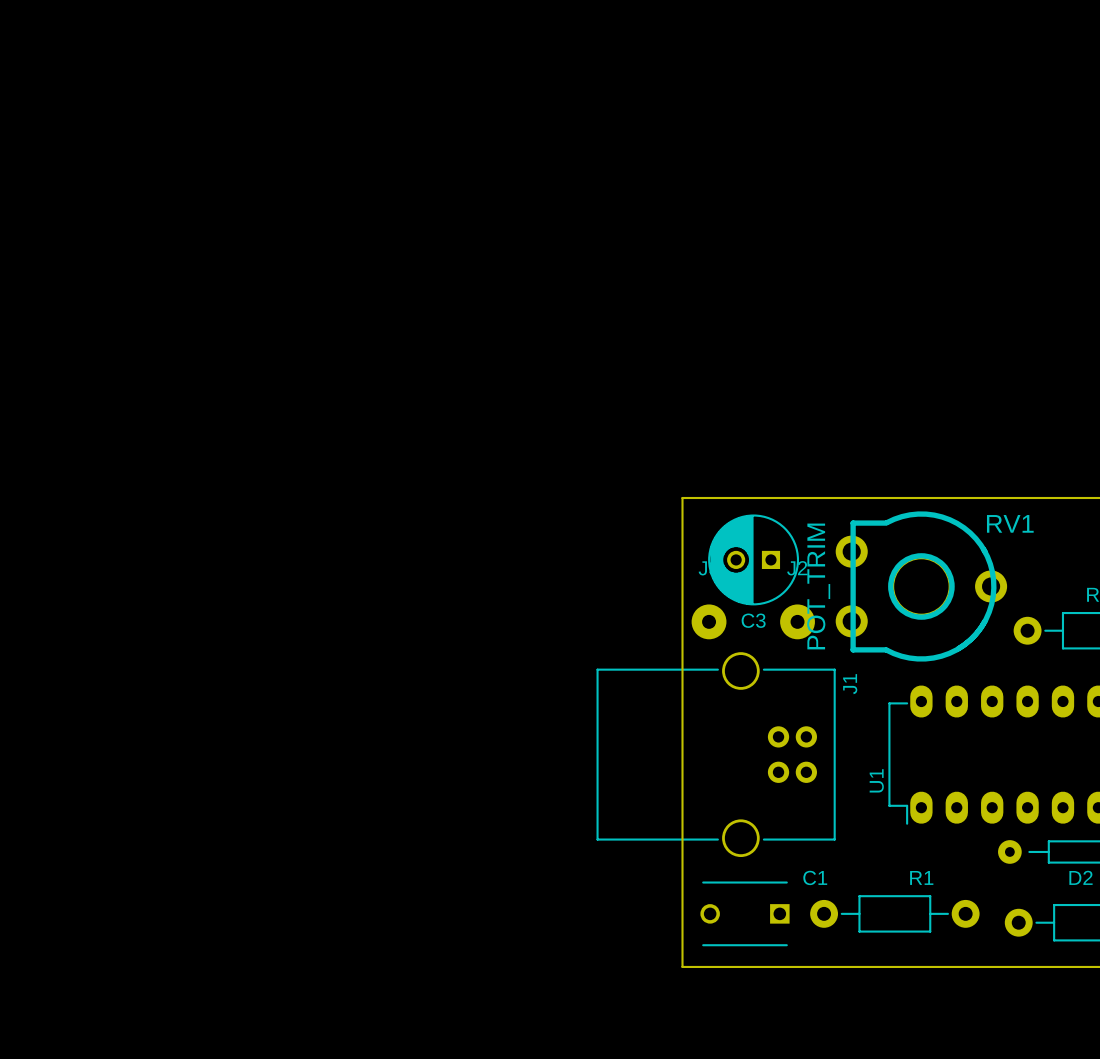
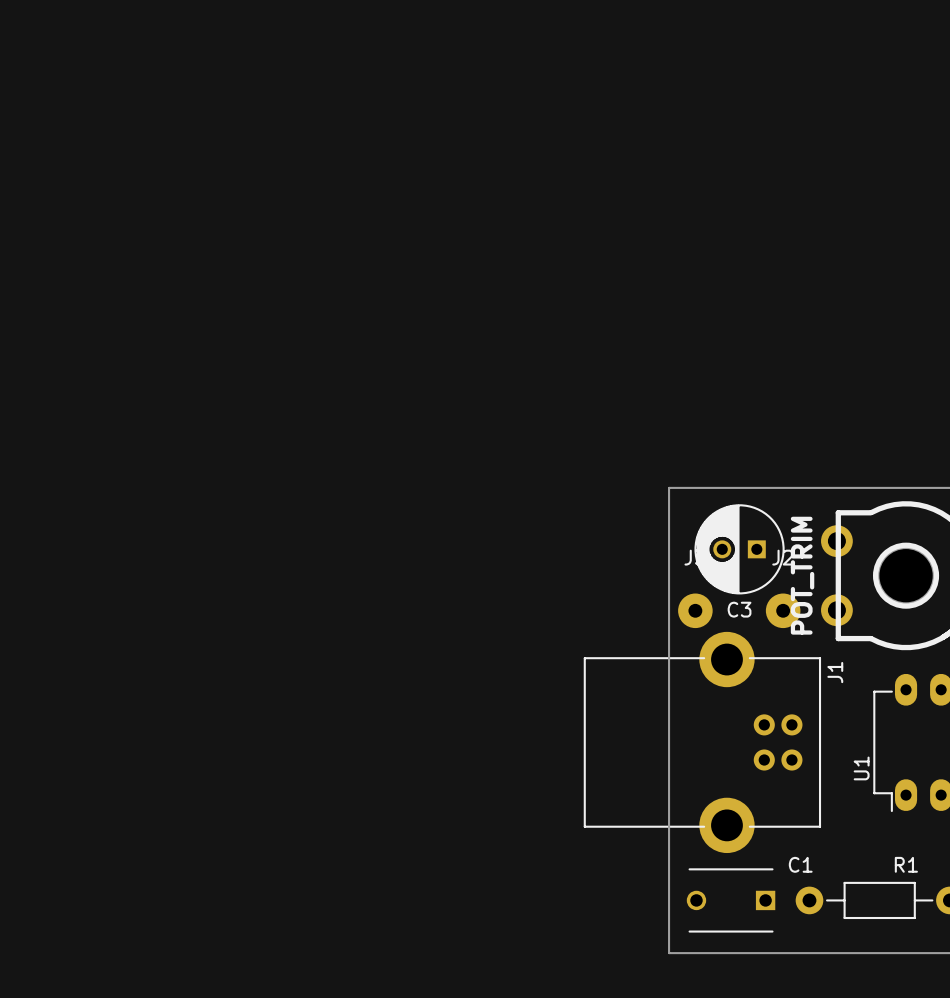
J1 footprint: [596, 652, 836, 858] -> [583, 631, 822, 854]

